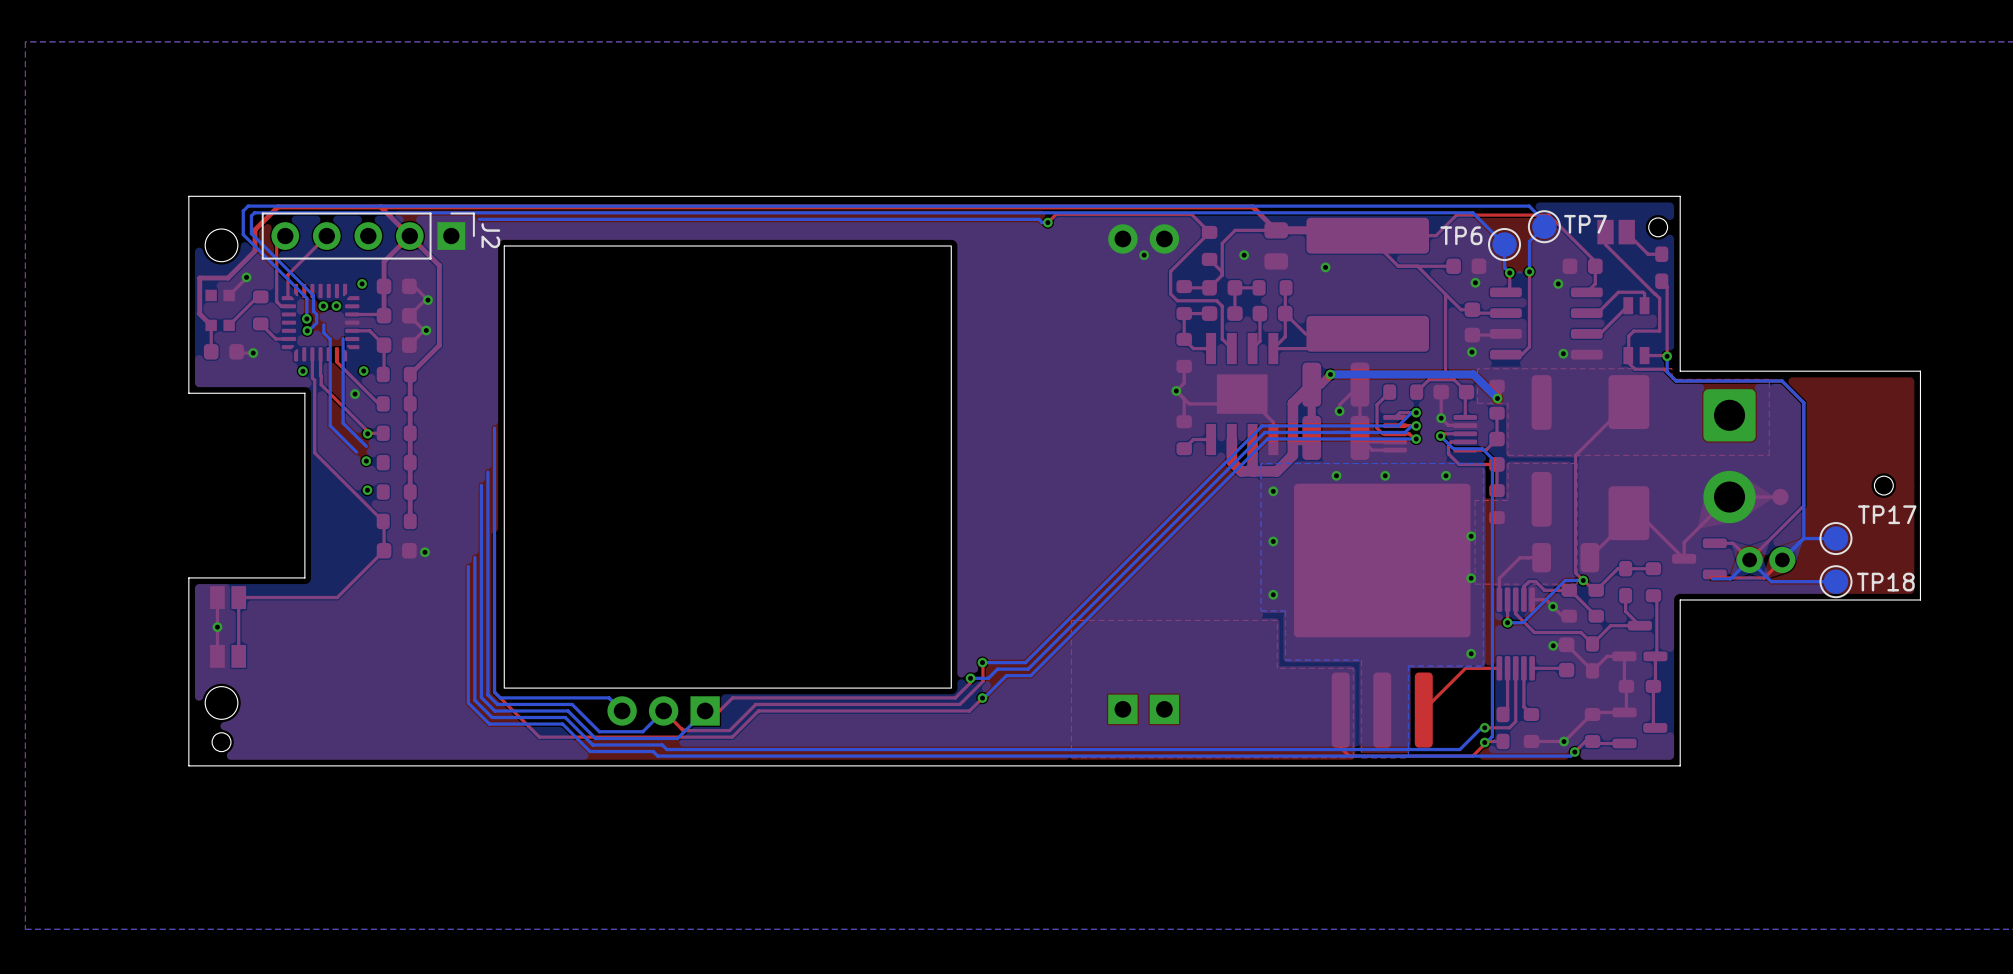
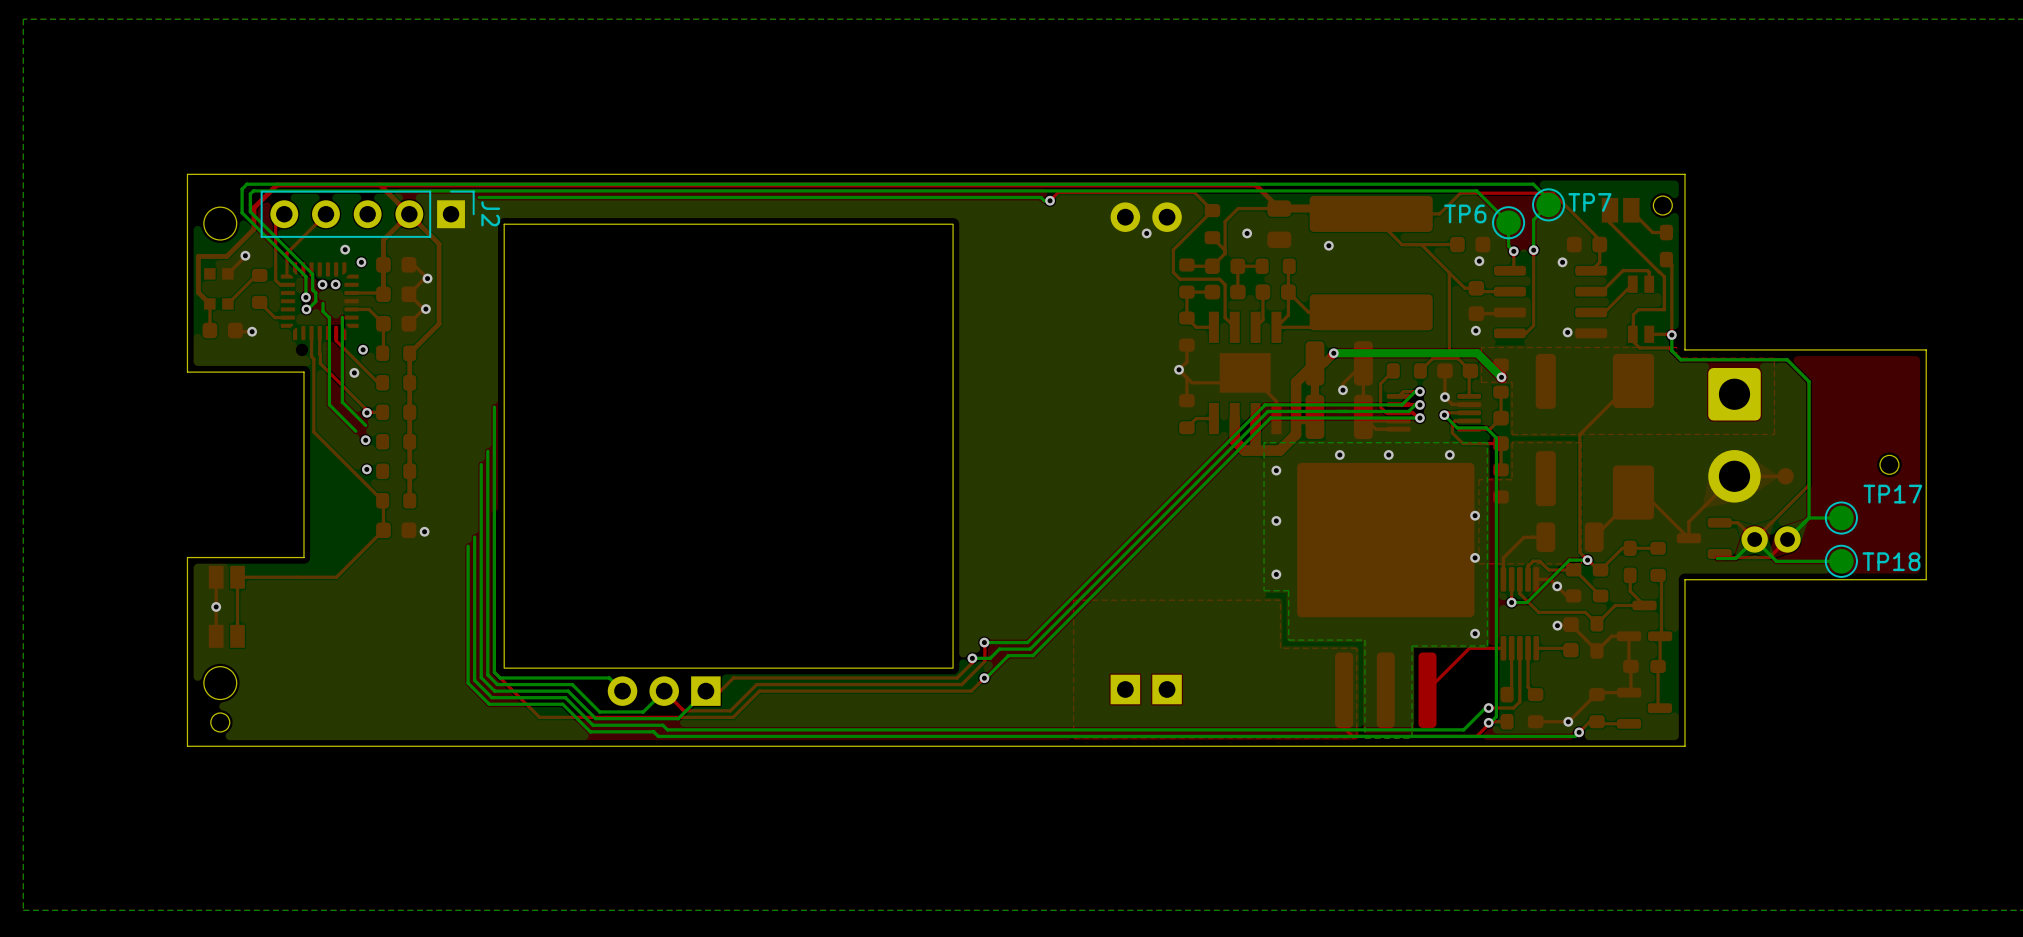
via: none -> (345, 249)
via: (302, 371) -> none

